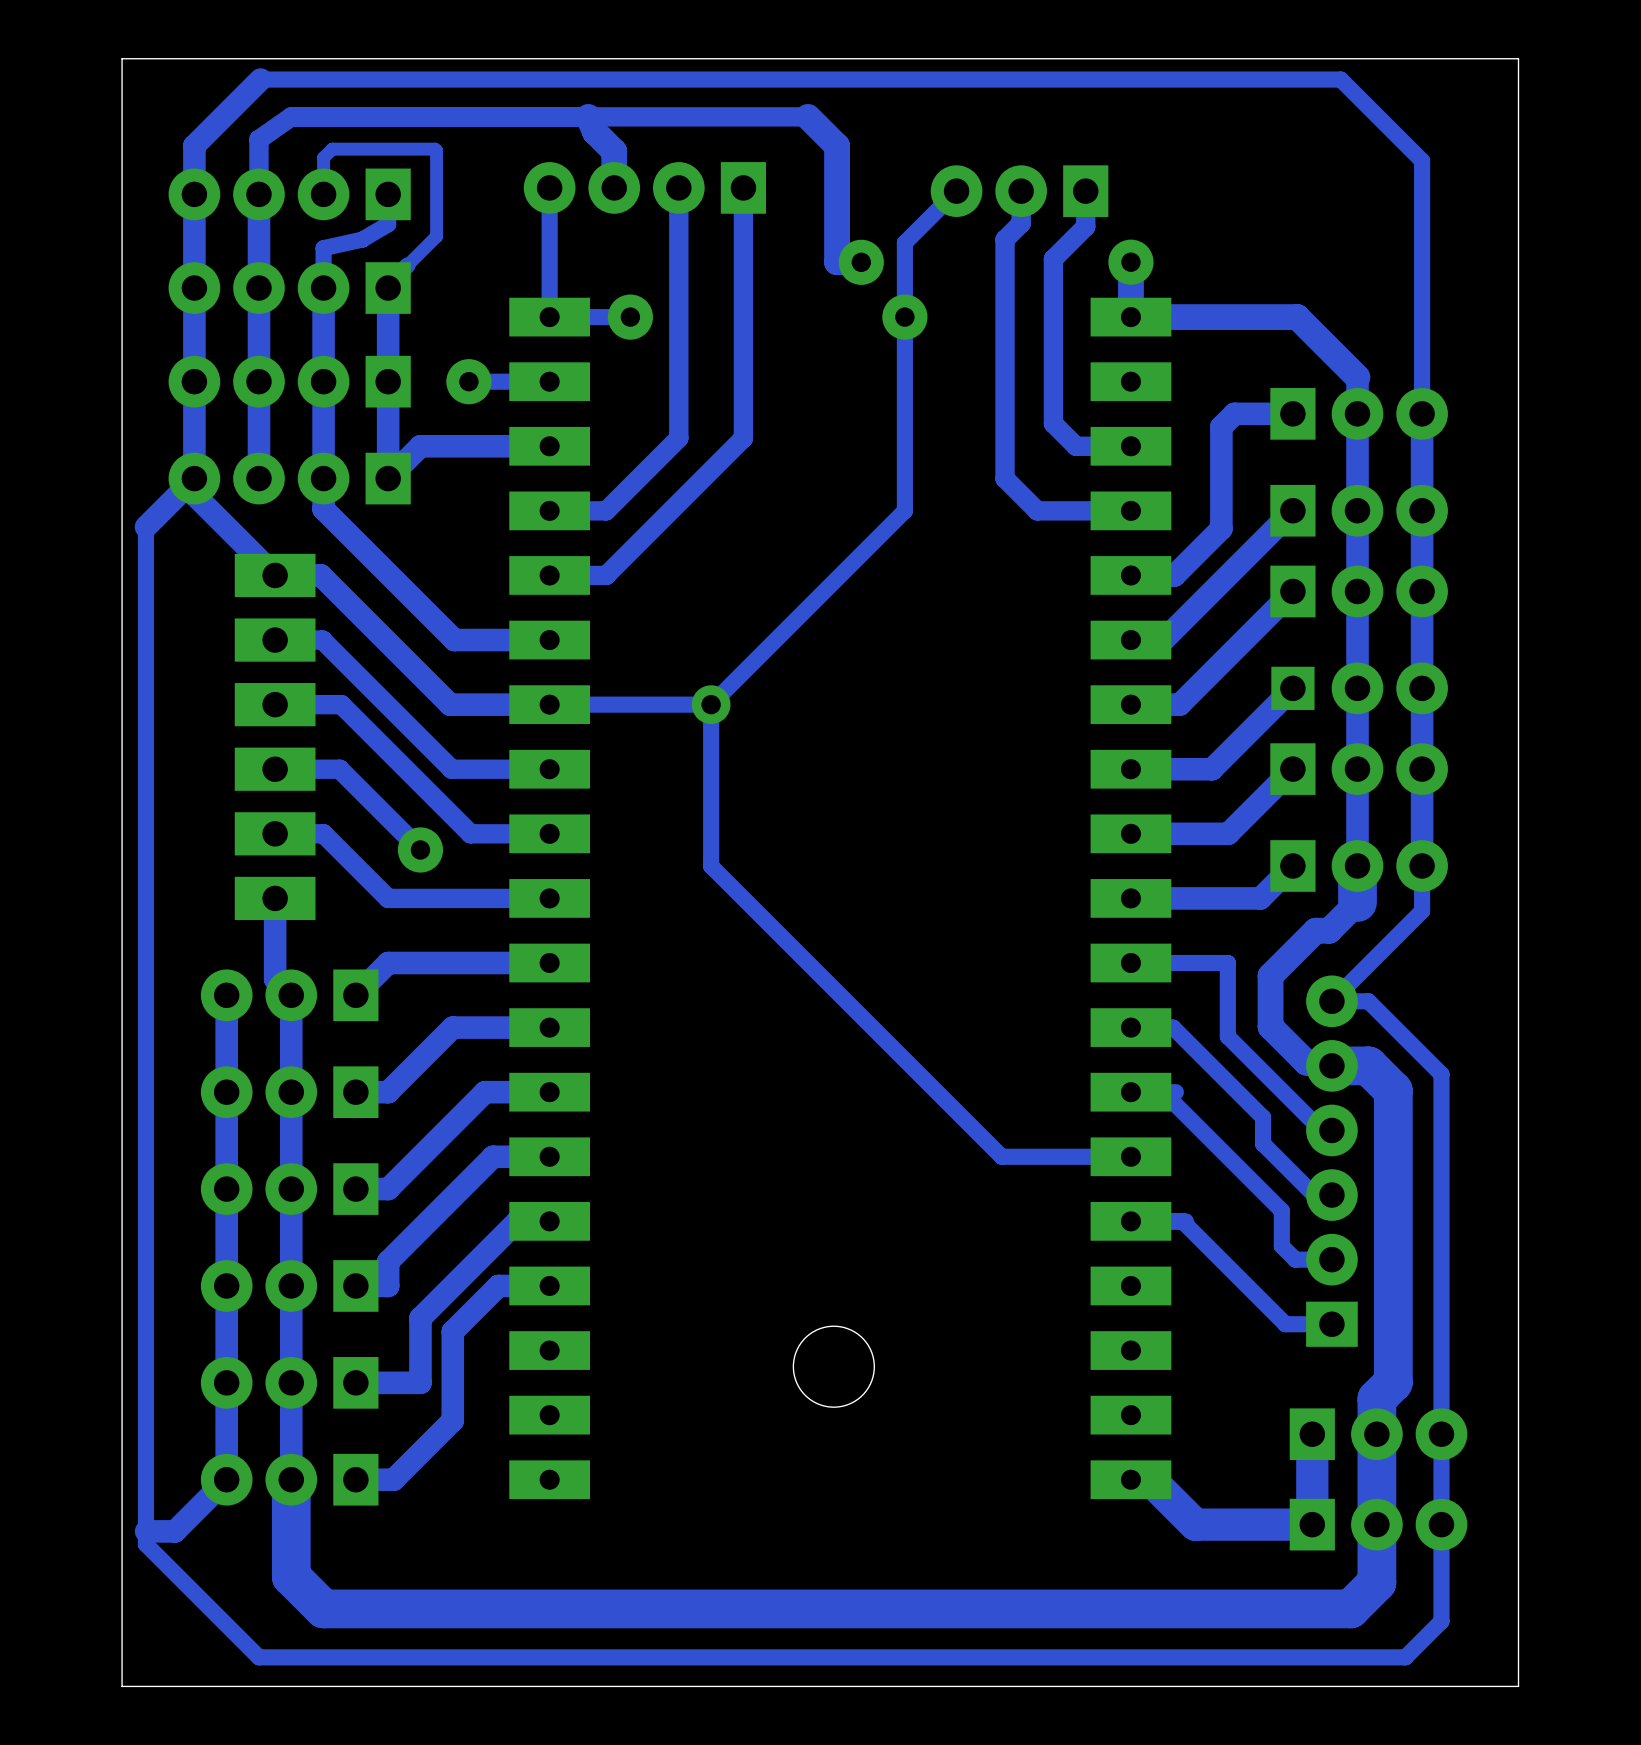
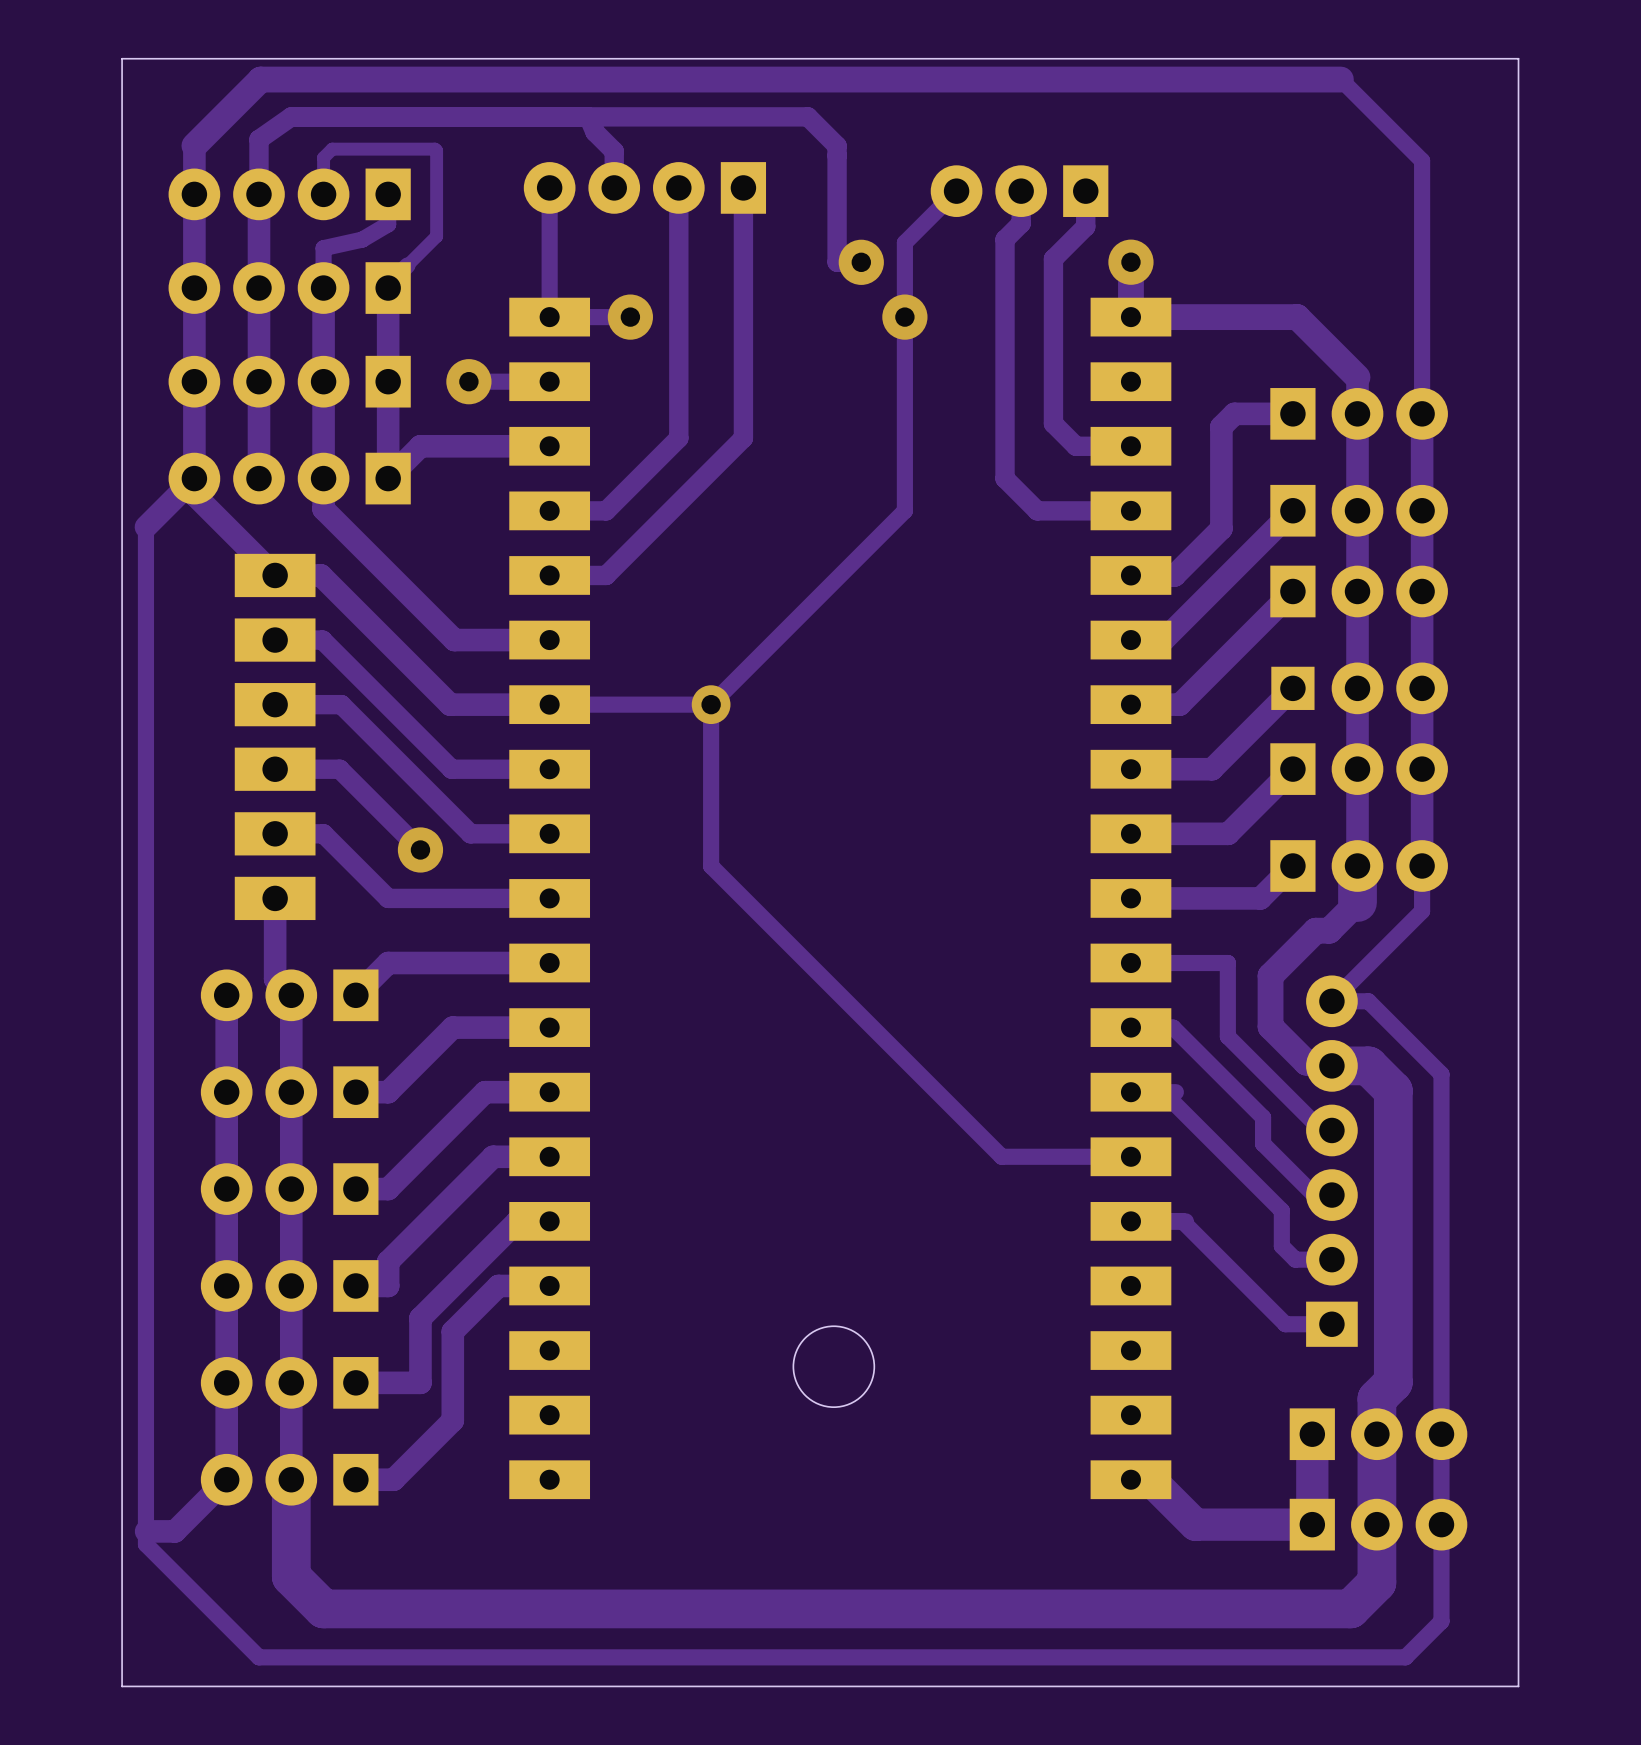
track width: thin (1340, 79) (260, 79) (194, 145) -> thick (1340, 79) (260, 79) (194, 145)
track width: thick (588, 116) (595, 132) (614, 151) (614, 187) -> thin (588, 116) (595, 132) (614, 151) (614, 187)
track width: thick (808, 116) (837, 145) (837, 262) (861, 262) -> thin (808, 116) (837, 145) (837, 262) (861, 262)

